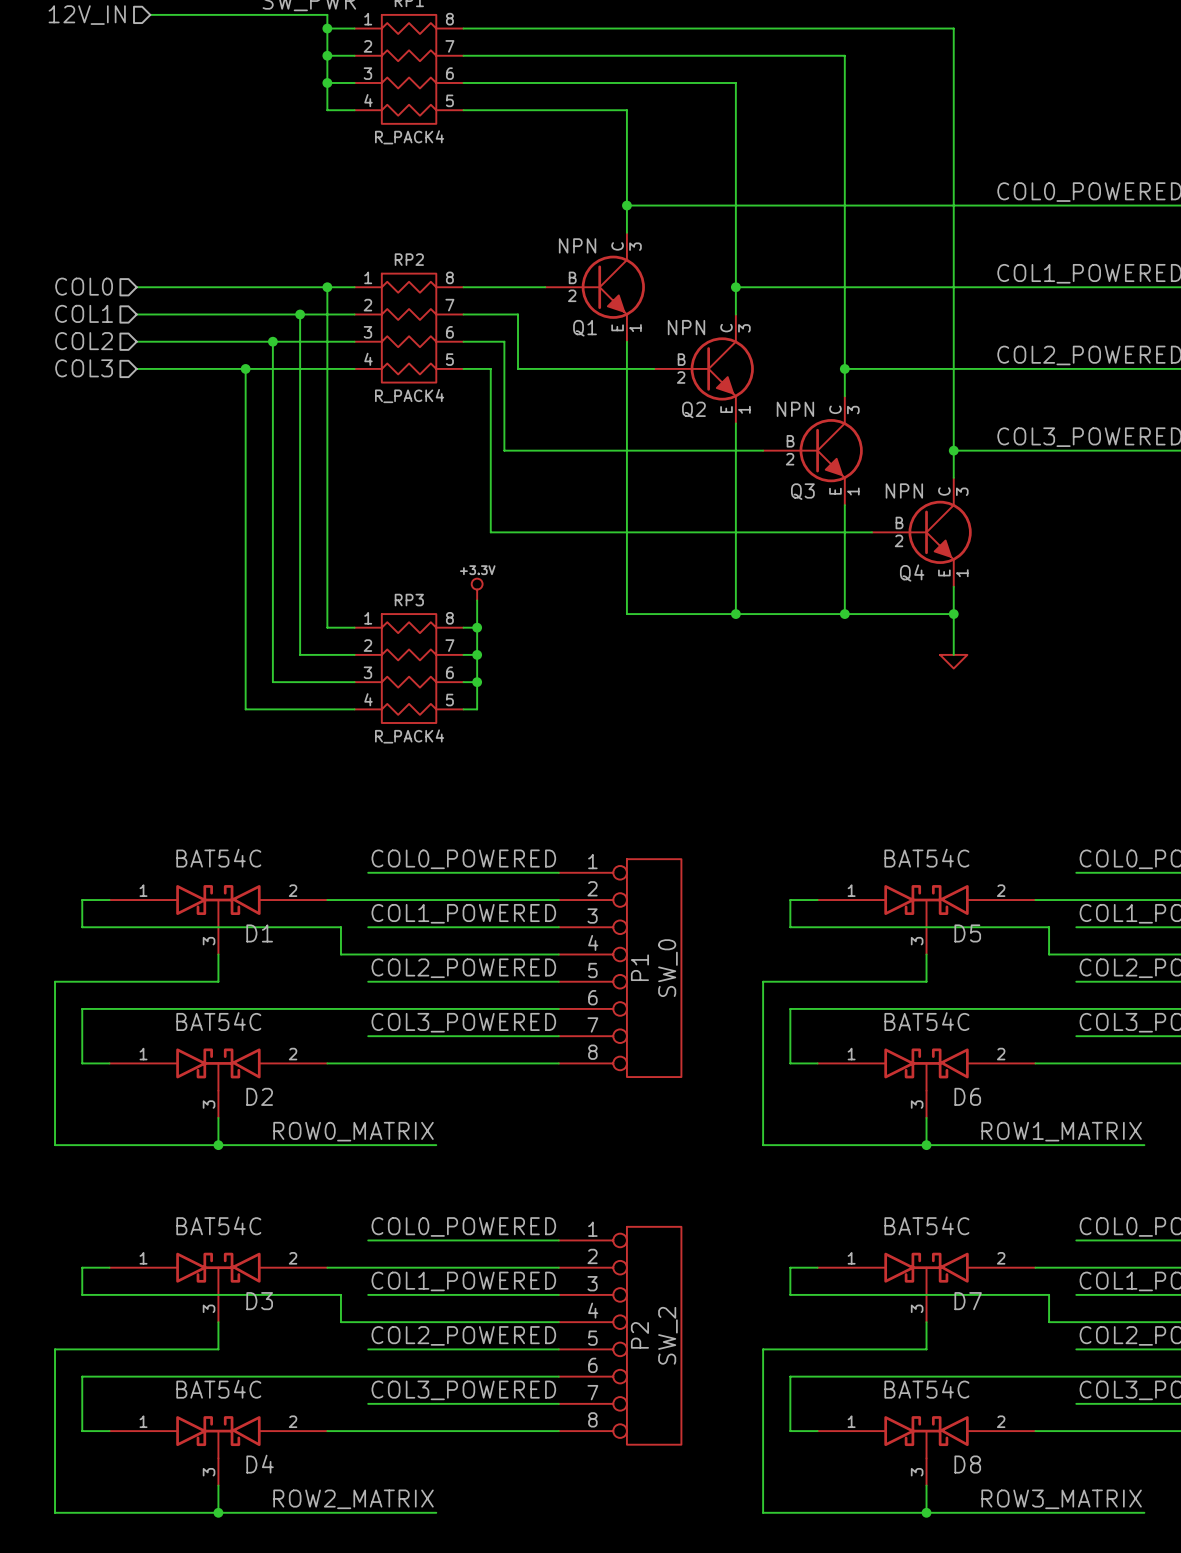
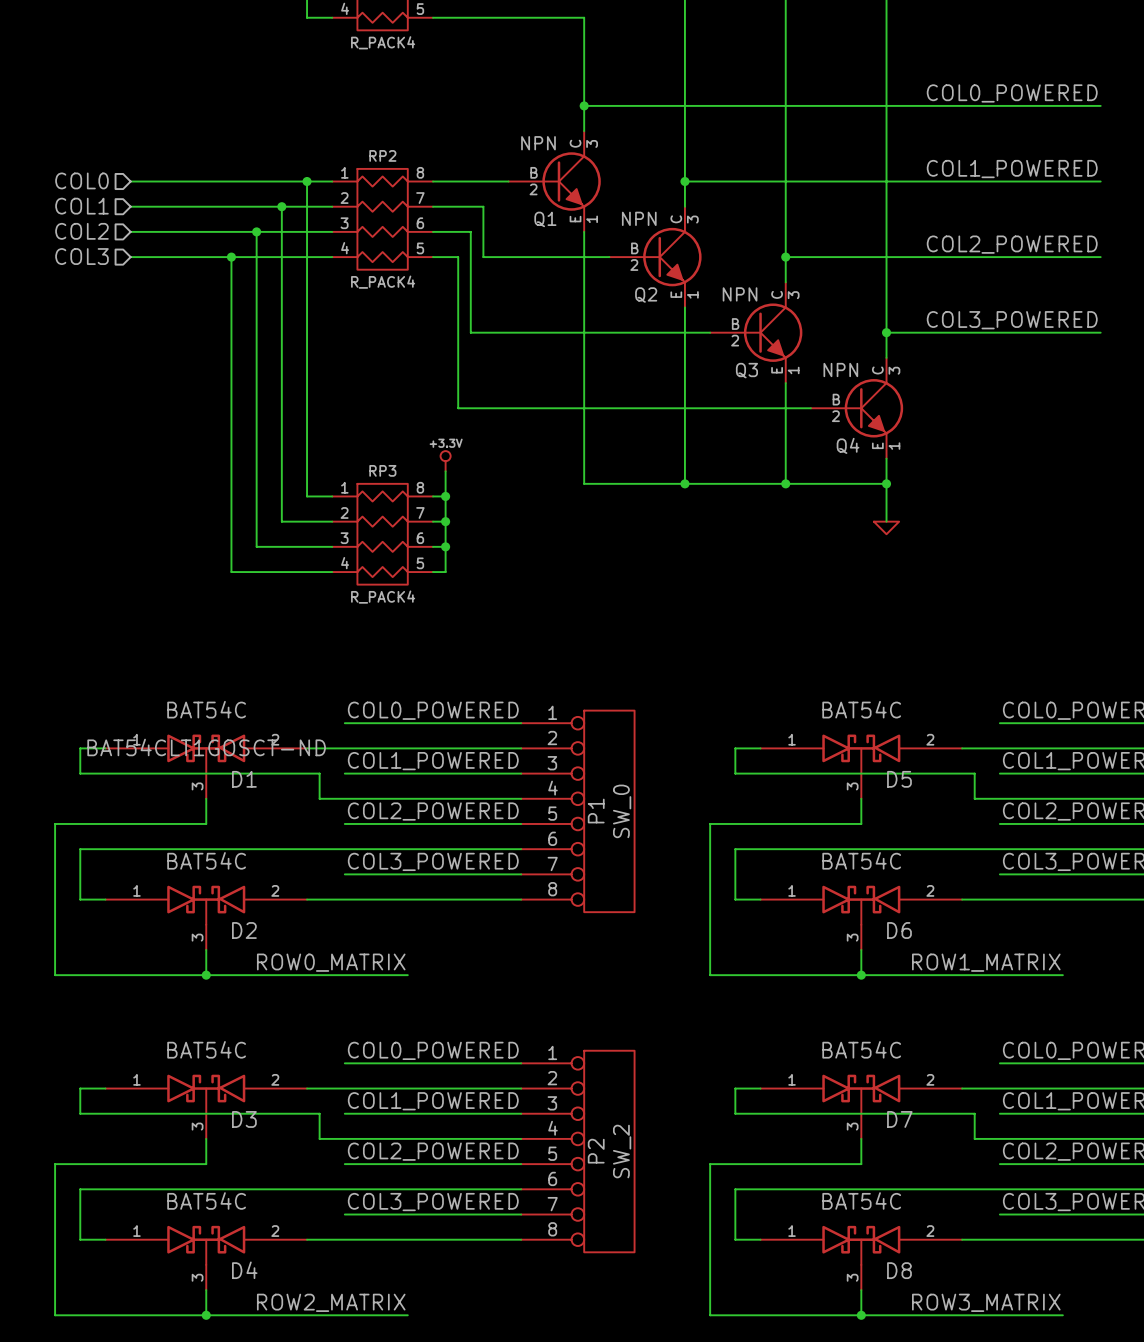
D1 text: none -> BAT54CLT1GOSCT-ND (206, 747)

